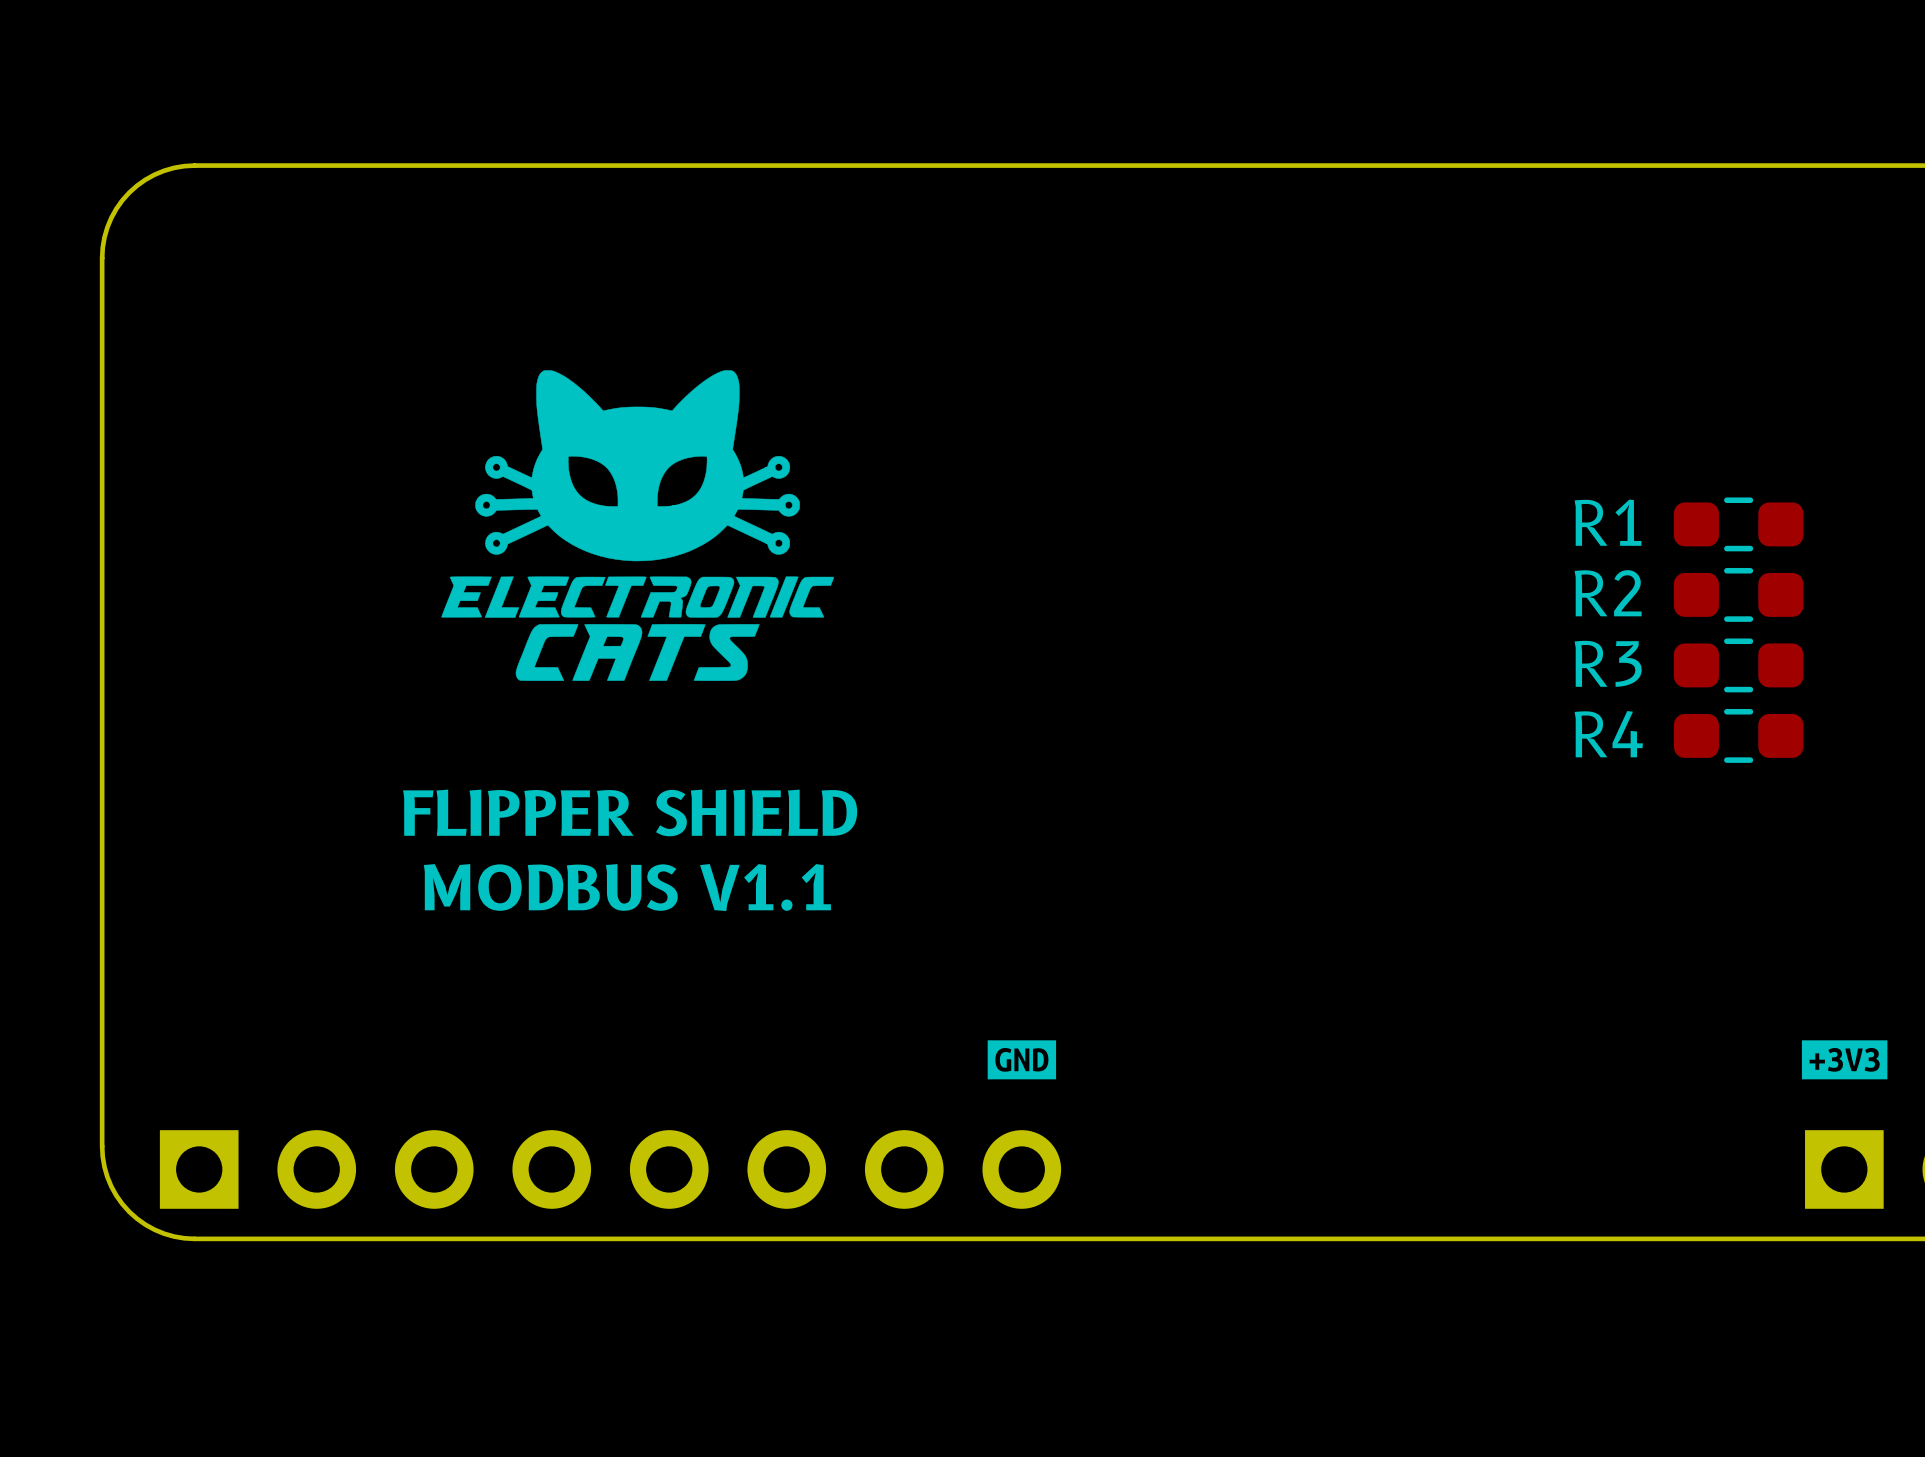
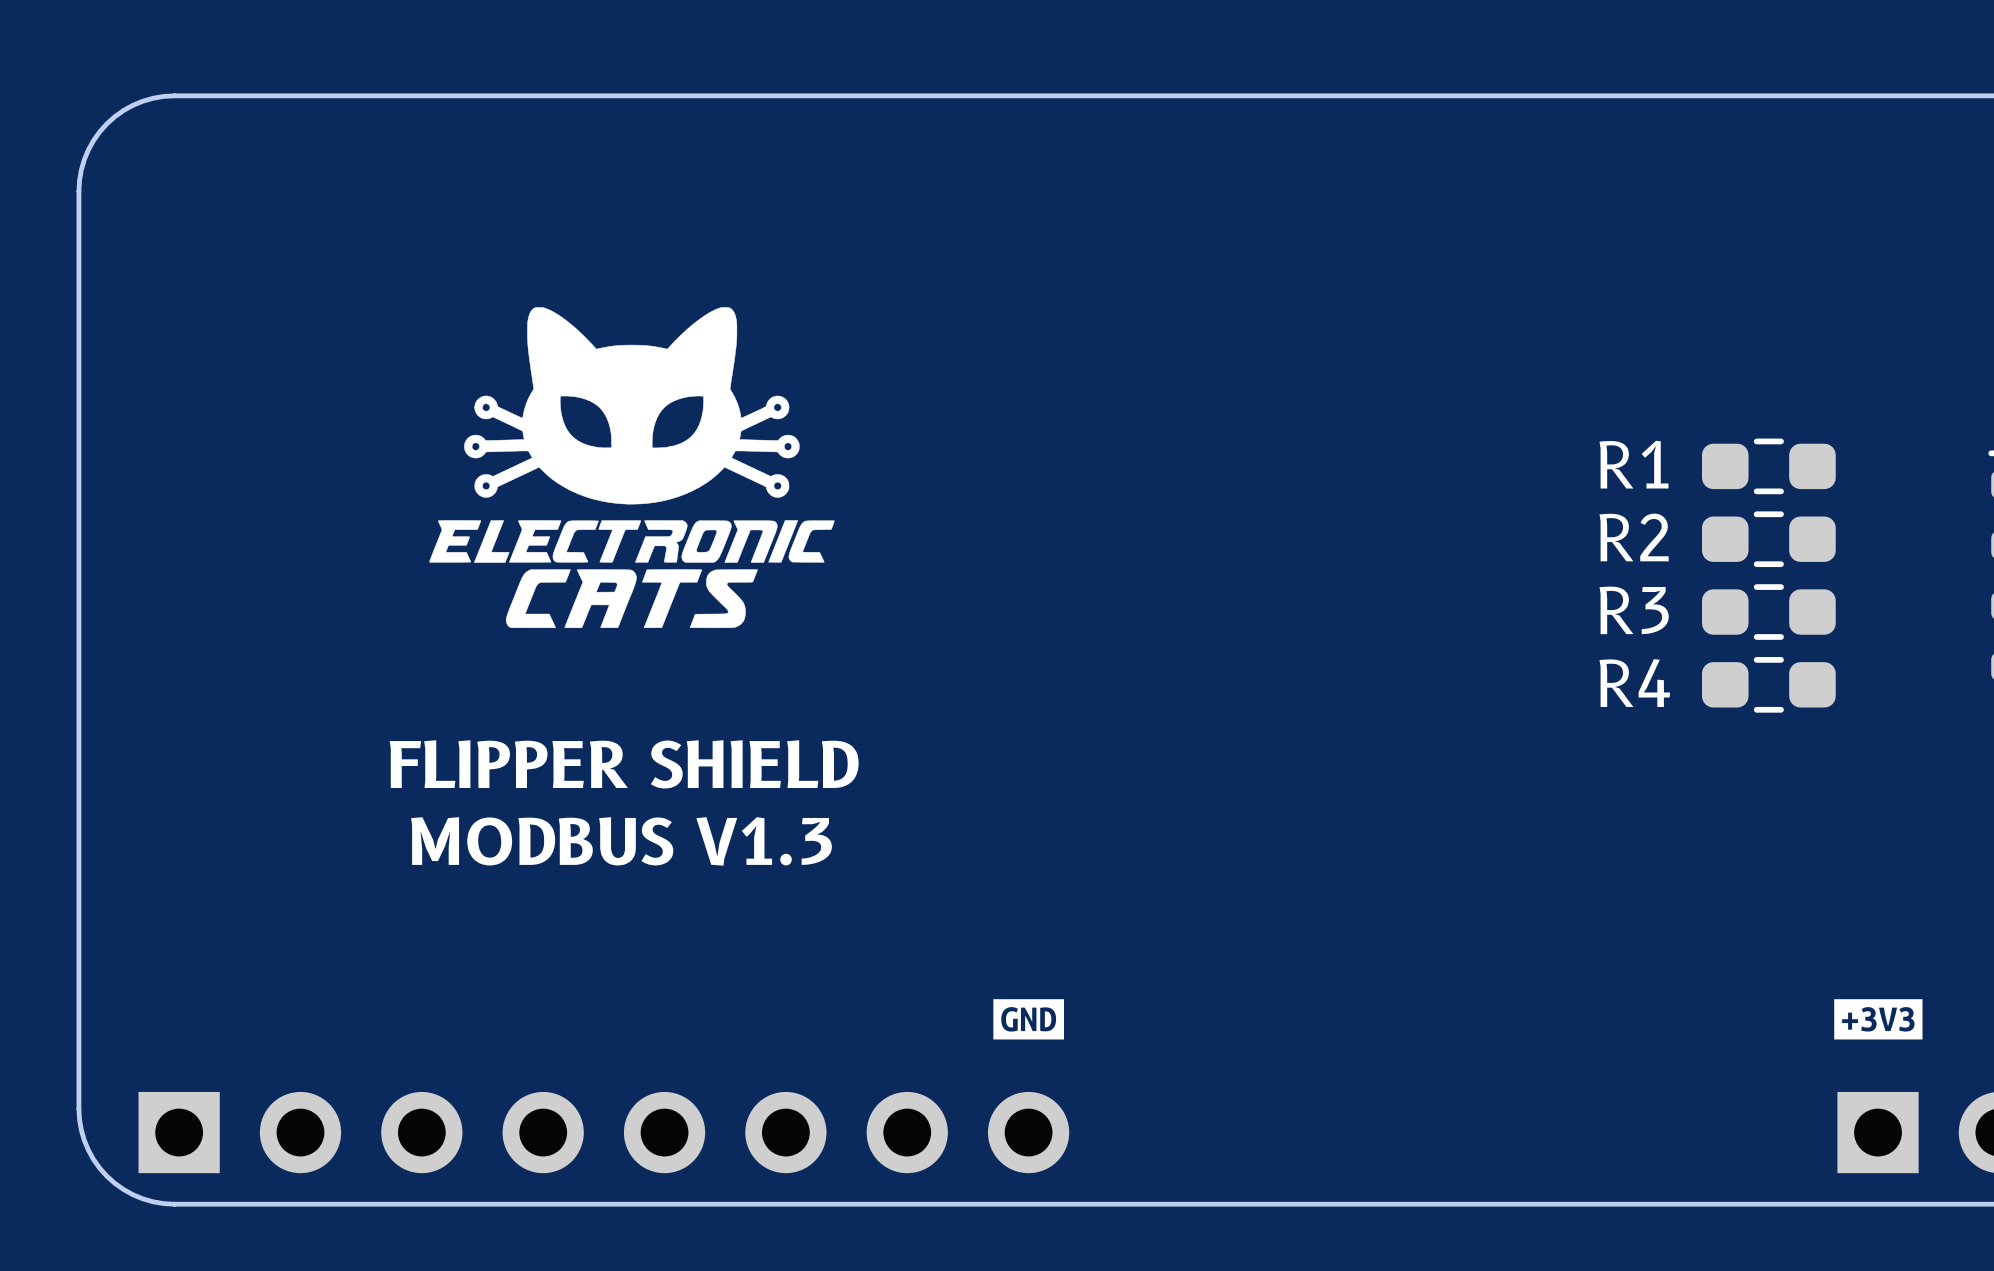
text: MODBUS V1.1 (627, 887) -> MODBUS V1.3 (621, 841)

